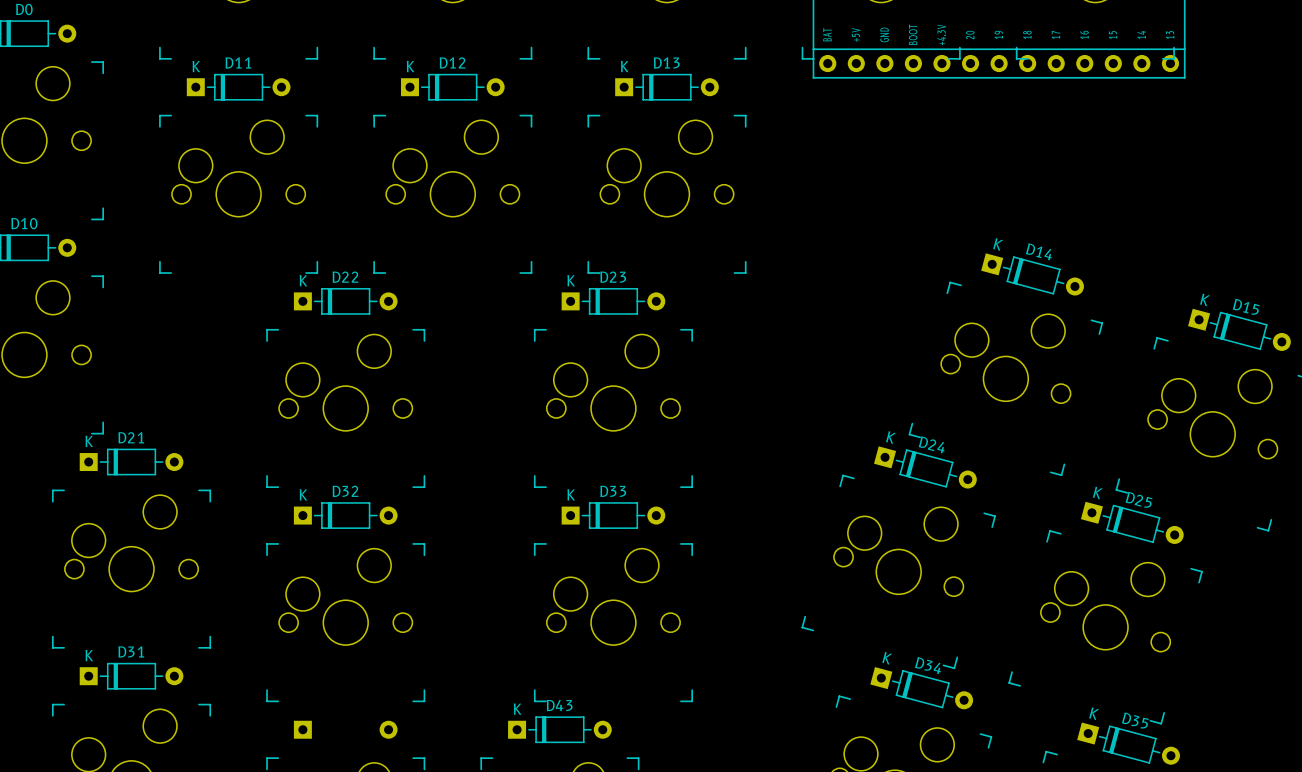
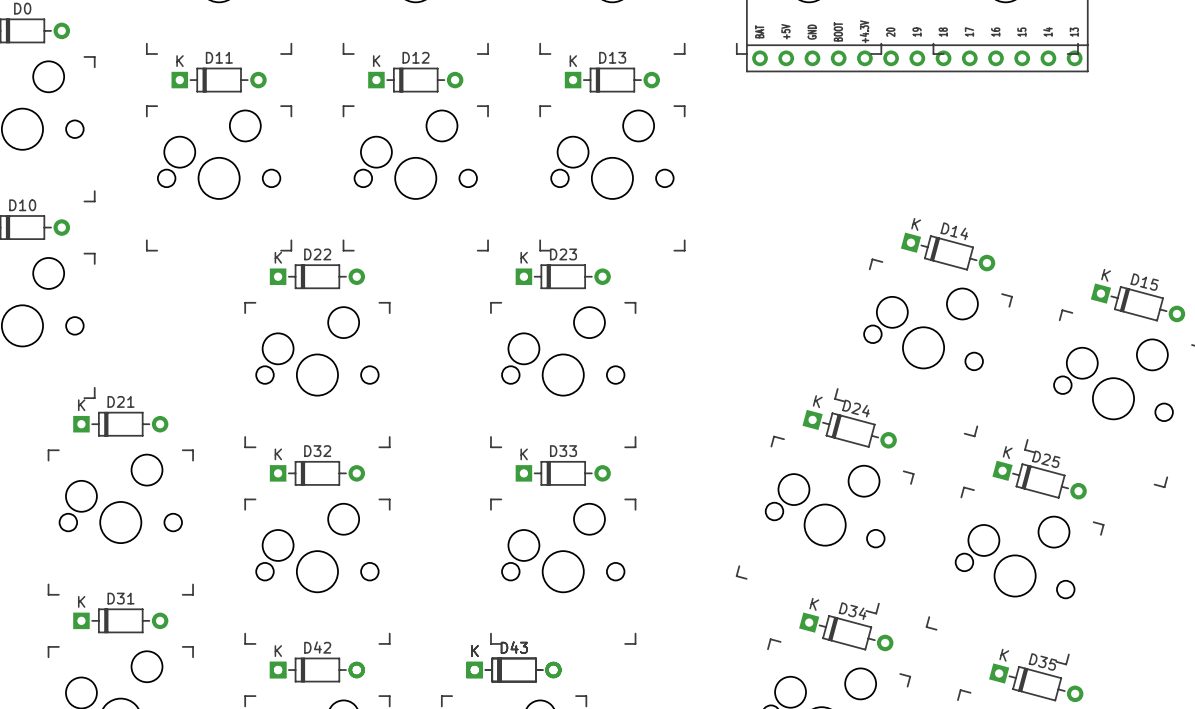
D42: none -> (317, 670)
D43: none -> (514, 670)

